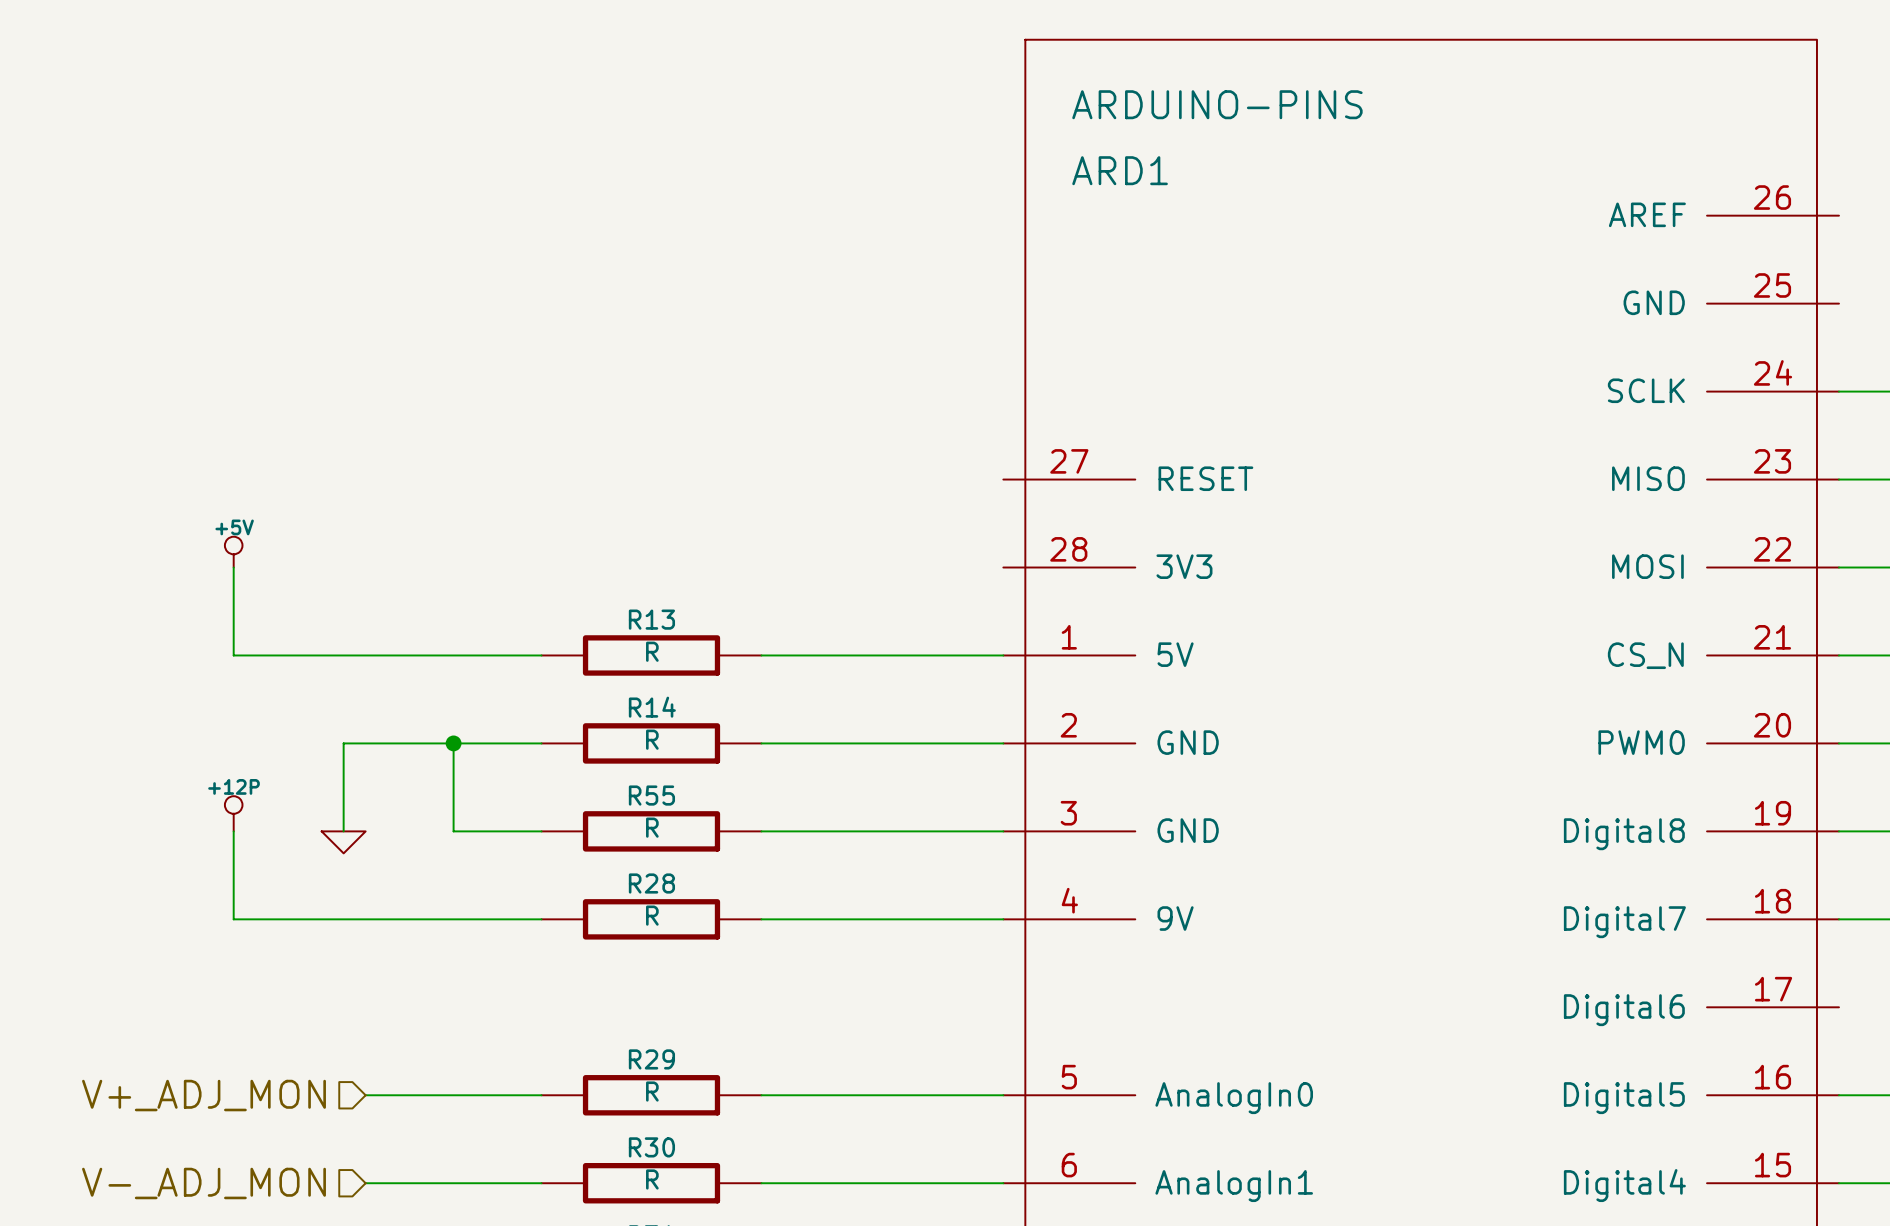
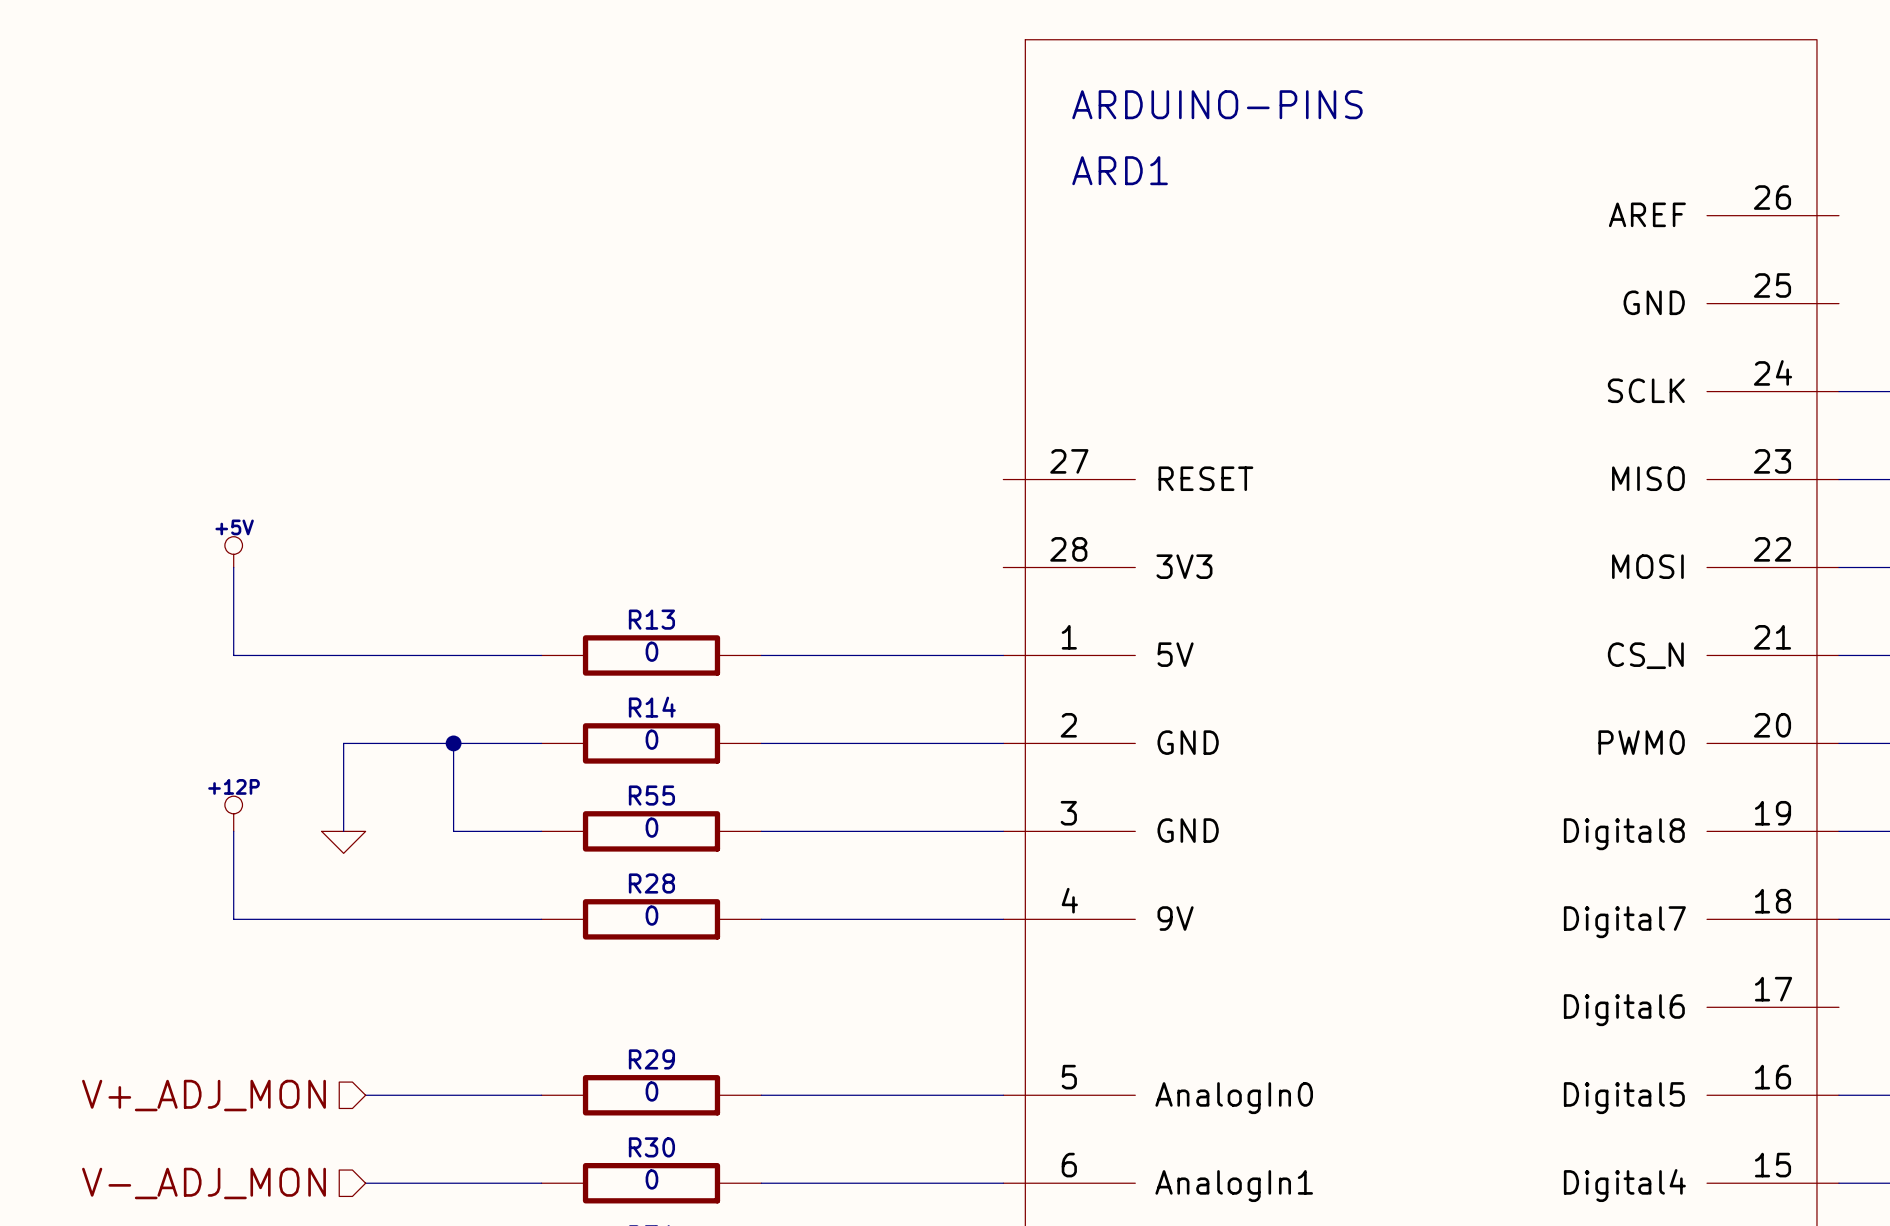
R13 value: R (652, 651) -> 0 (651, 651)
R14 value: R (652, 739) -> 0 (651, 739)
R55 value: R (652, 827) -> 0 (651, 827)
R28 value: R (652, 915) -> 0 (651, 915)
R29 value: R (652, 1091) -> 0 (651, 1091)
R30 value: R (652, 1179) -> 0 (651, 1179)

